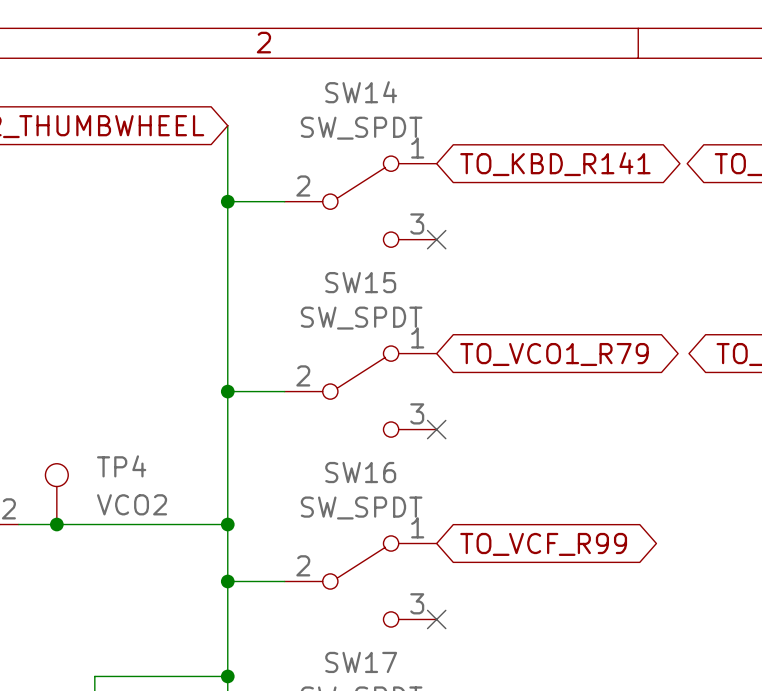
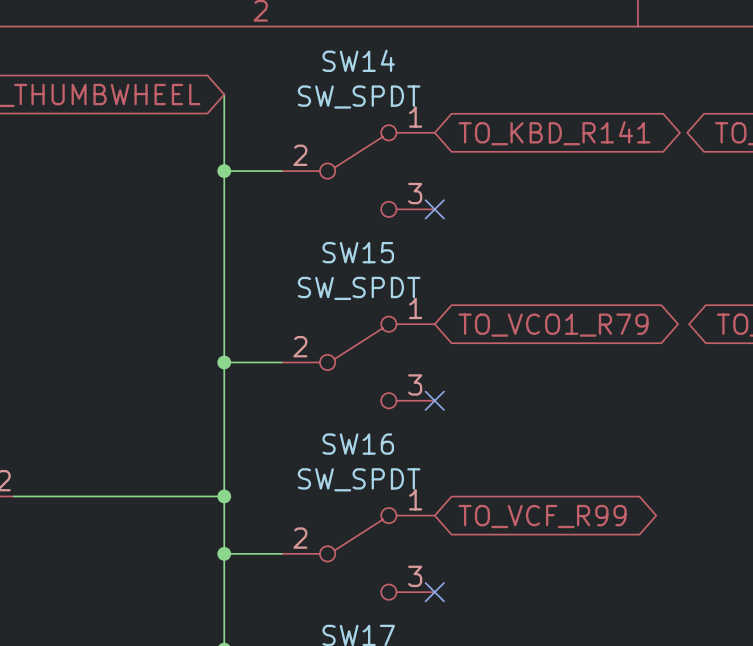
TP4: VCO2 (56, 494) -> none
junction: (56, 524) -> none

